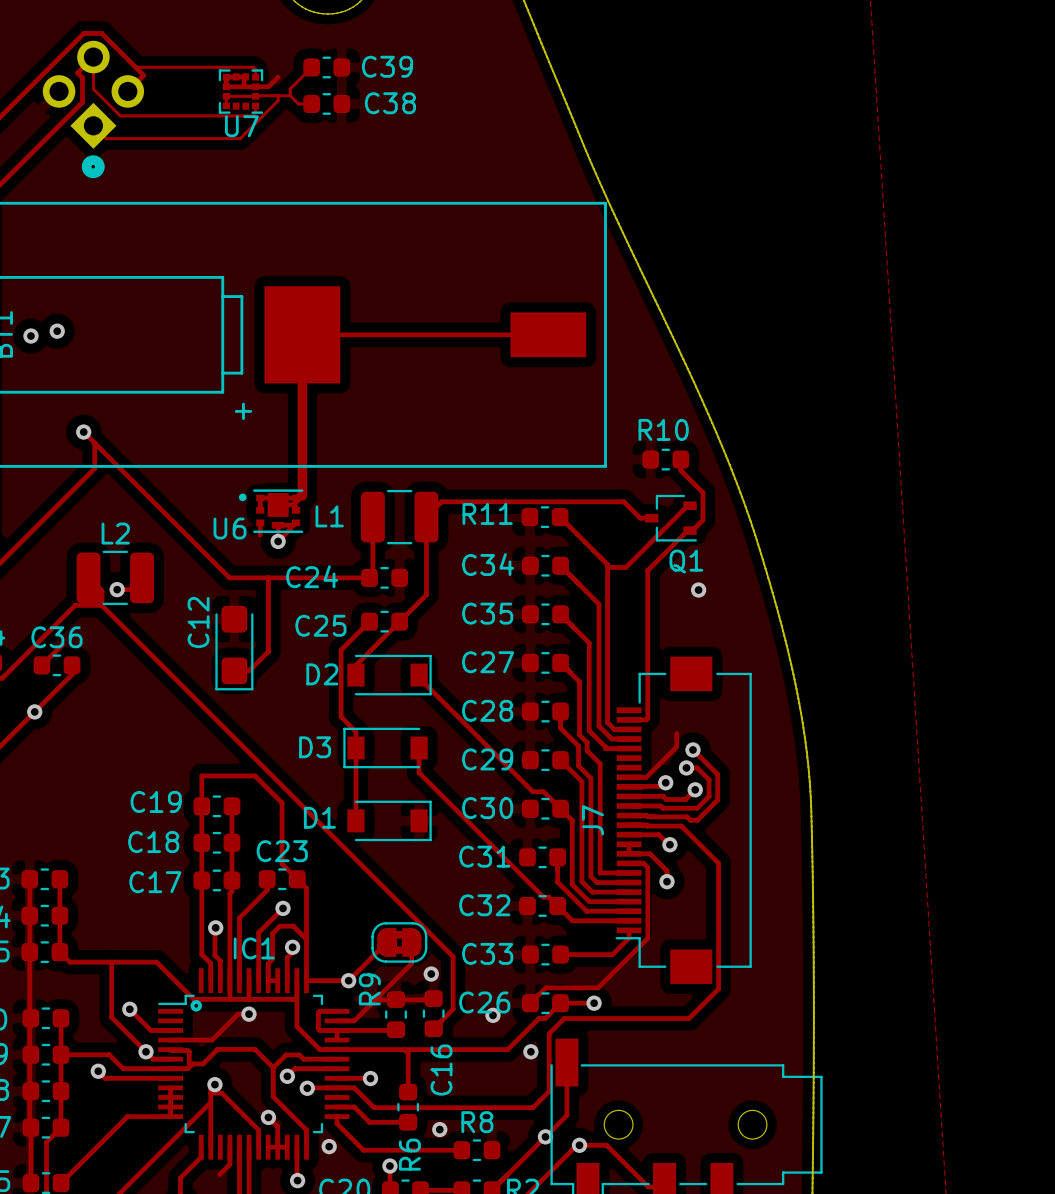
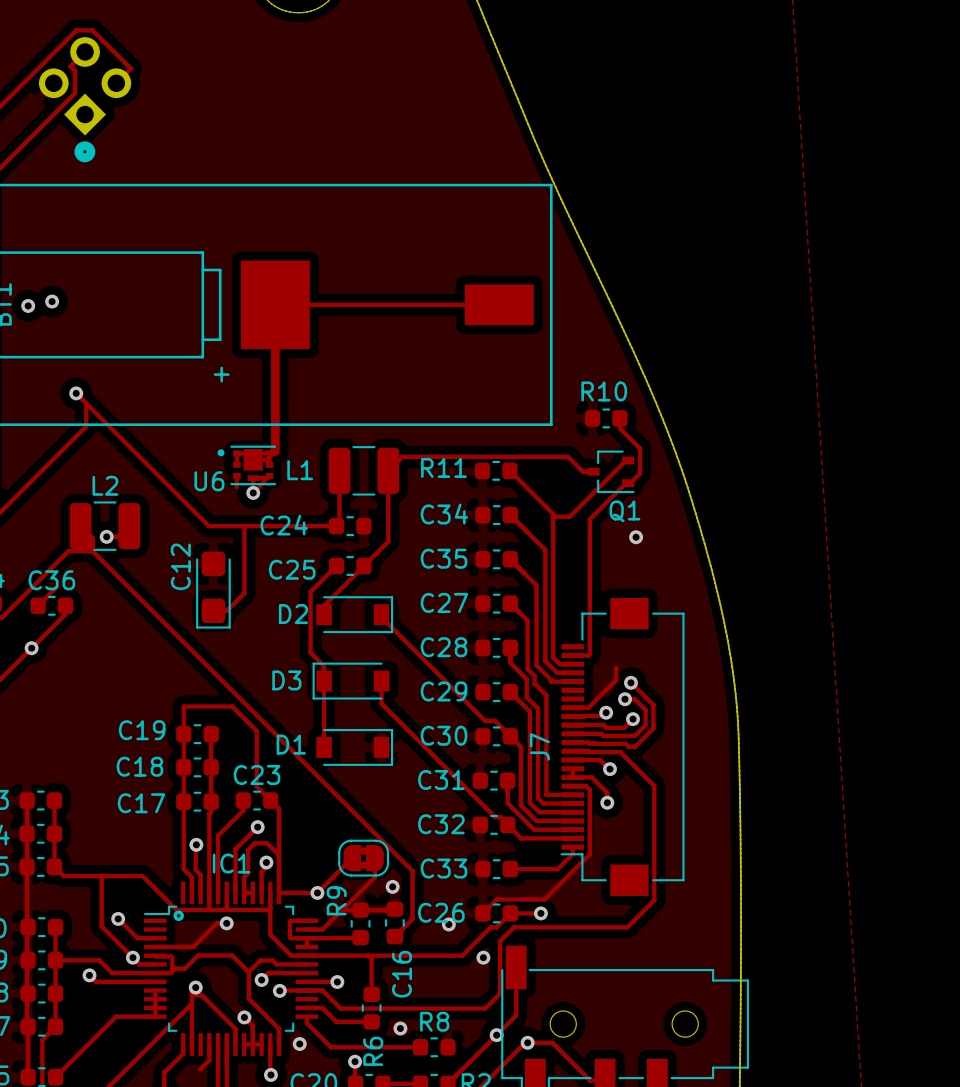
track: (93, 57) (93, 89) (120, 115) (252, 115) (255, 112) (255, 105) -> none
track: (136, 67) (253, 67) (255, 69) (255, 77) -> none
track: (311, 67) (290, 88) (290, 95) -> none
C39: (326, 67) -> none
track: (245, 76) (226, 77) (226, 86) (268, 86) (278, 77) -> none
track: (245, 77) (244, 86) -> none
U7: (240, 91) -> none
track: (278, 95) (278, 100) (240, 138) (106, 138) (93, 125) -> none
track: (290, 95) (298, 103) (308, 103) -> none
track: (290, 95) (226, 96) (226, 105) -> none
C38: (326, 103) -> none

